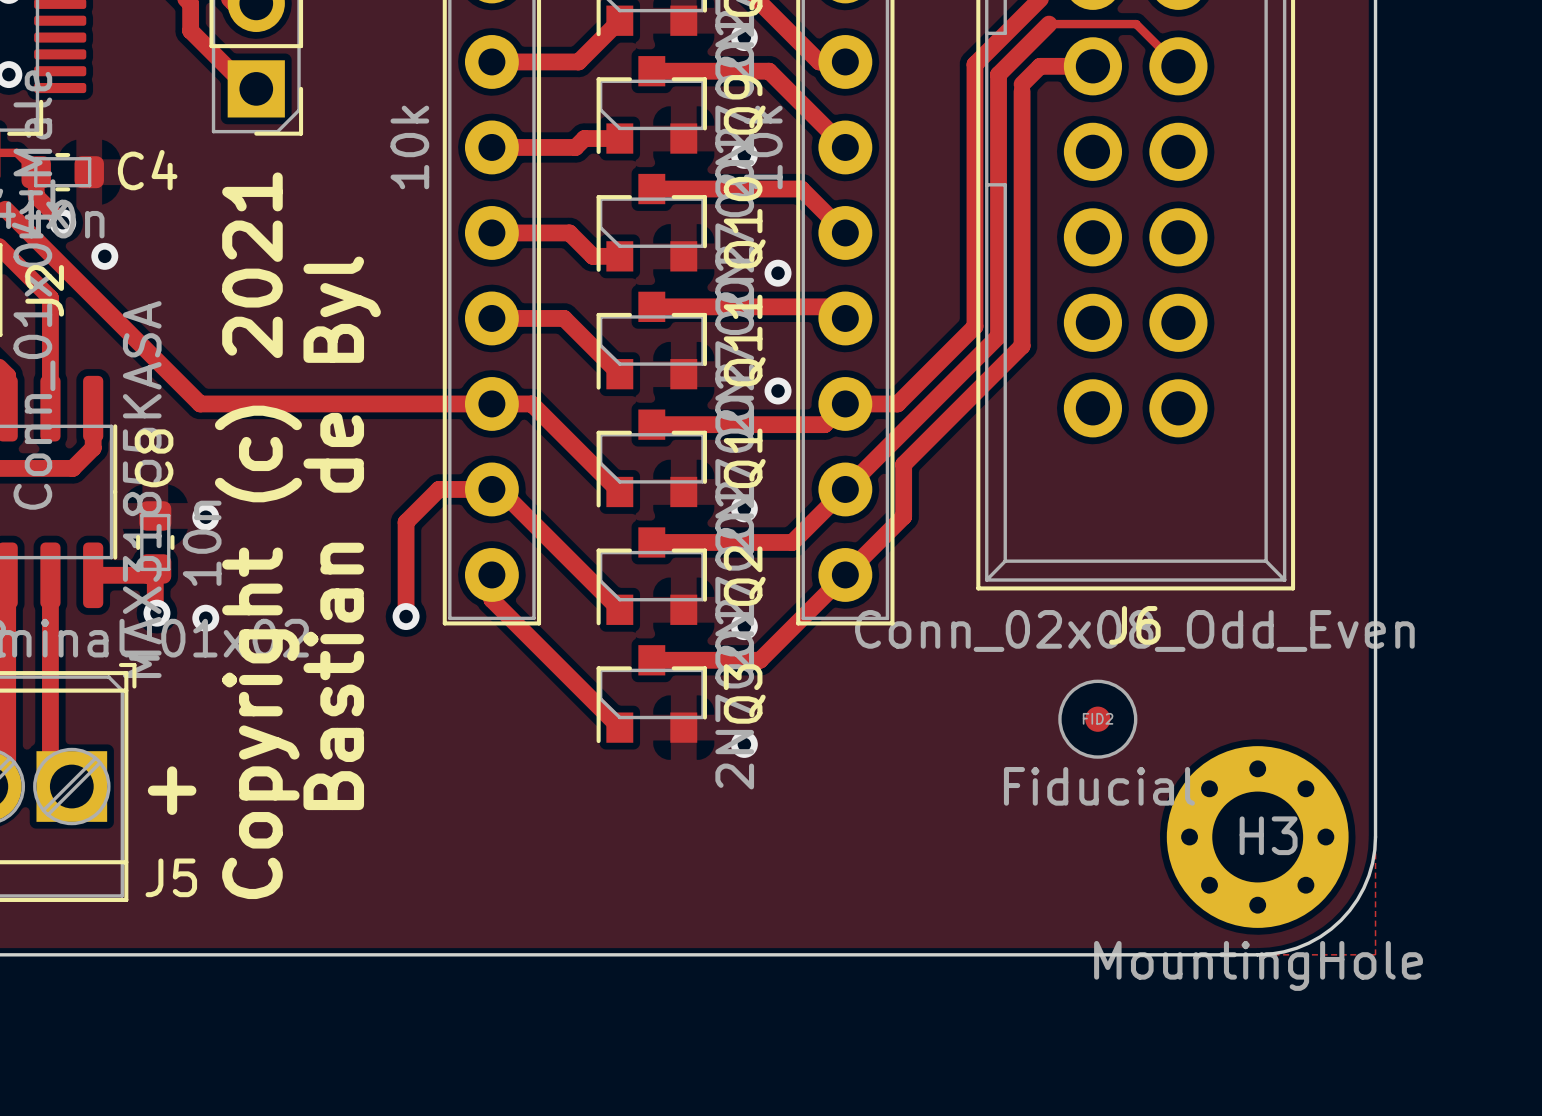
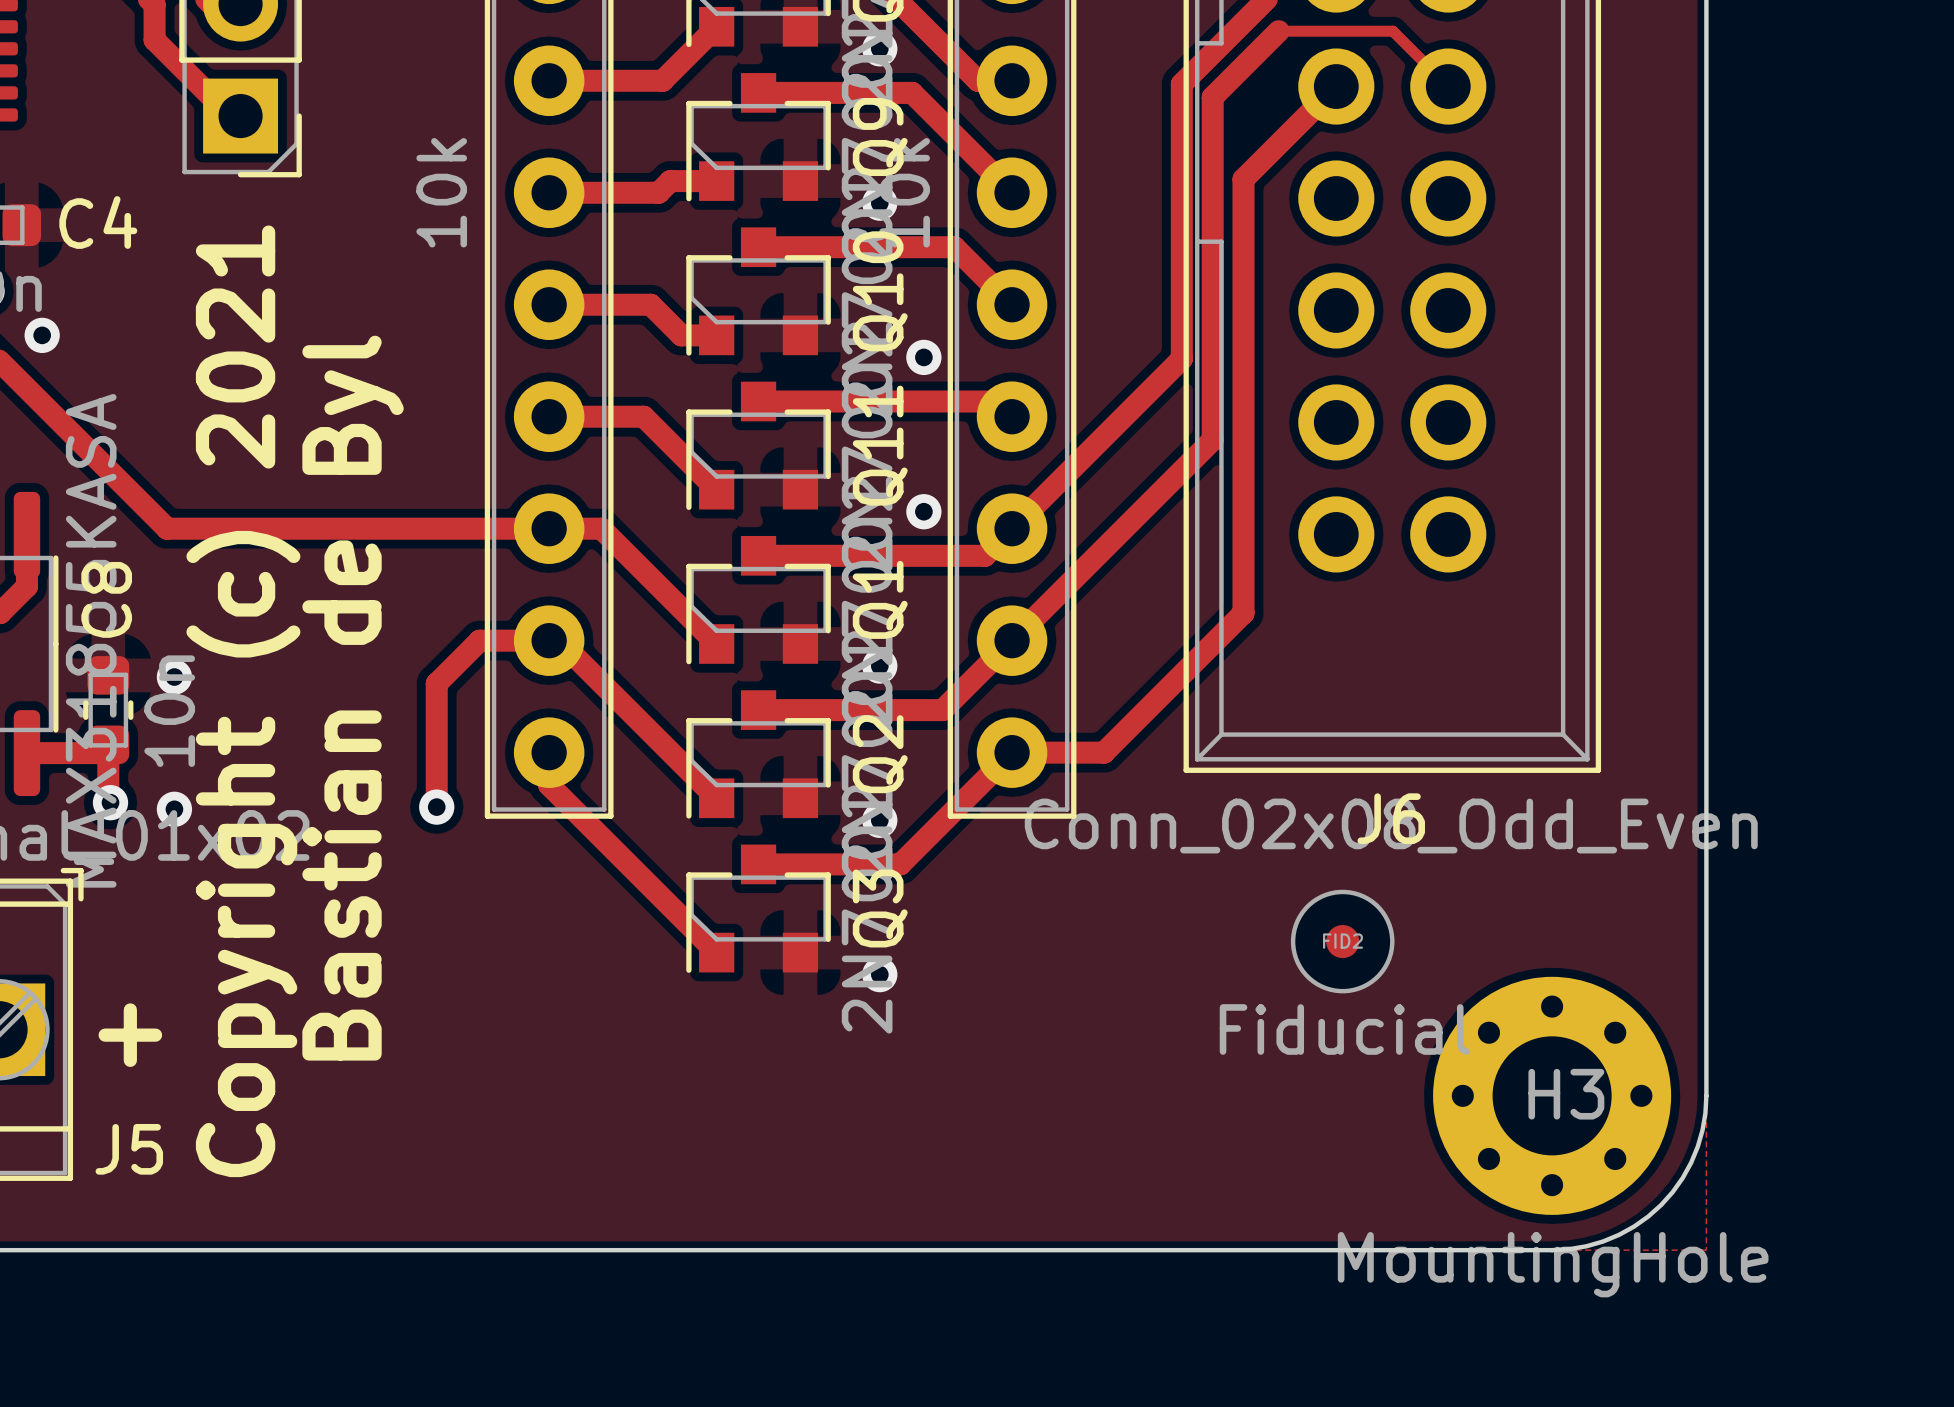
track: (1092, 66) (1040, 66) (1022, 84) -> (1336, 86) (1243, 179)
track: (1022, 91) (1022, 137) -> none
track: (974, 274) (974, 326) (897, 403) (845, 403) -> (1181, 358) (1012, 528)
track: (1022, 346) (903, 464) (903, 516) (845, 574) -> (1243, 452) (1243, 613) (1103, 752) (1012, 752)

